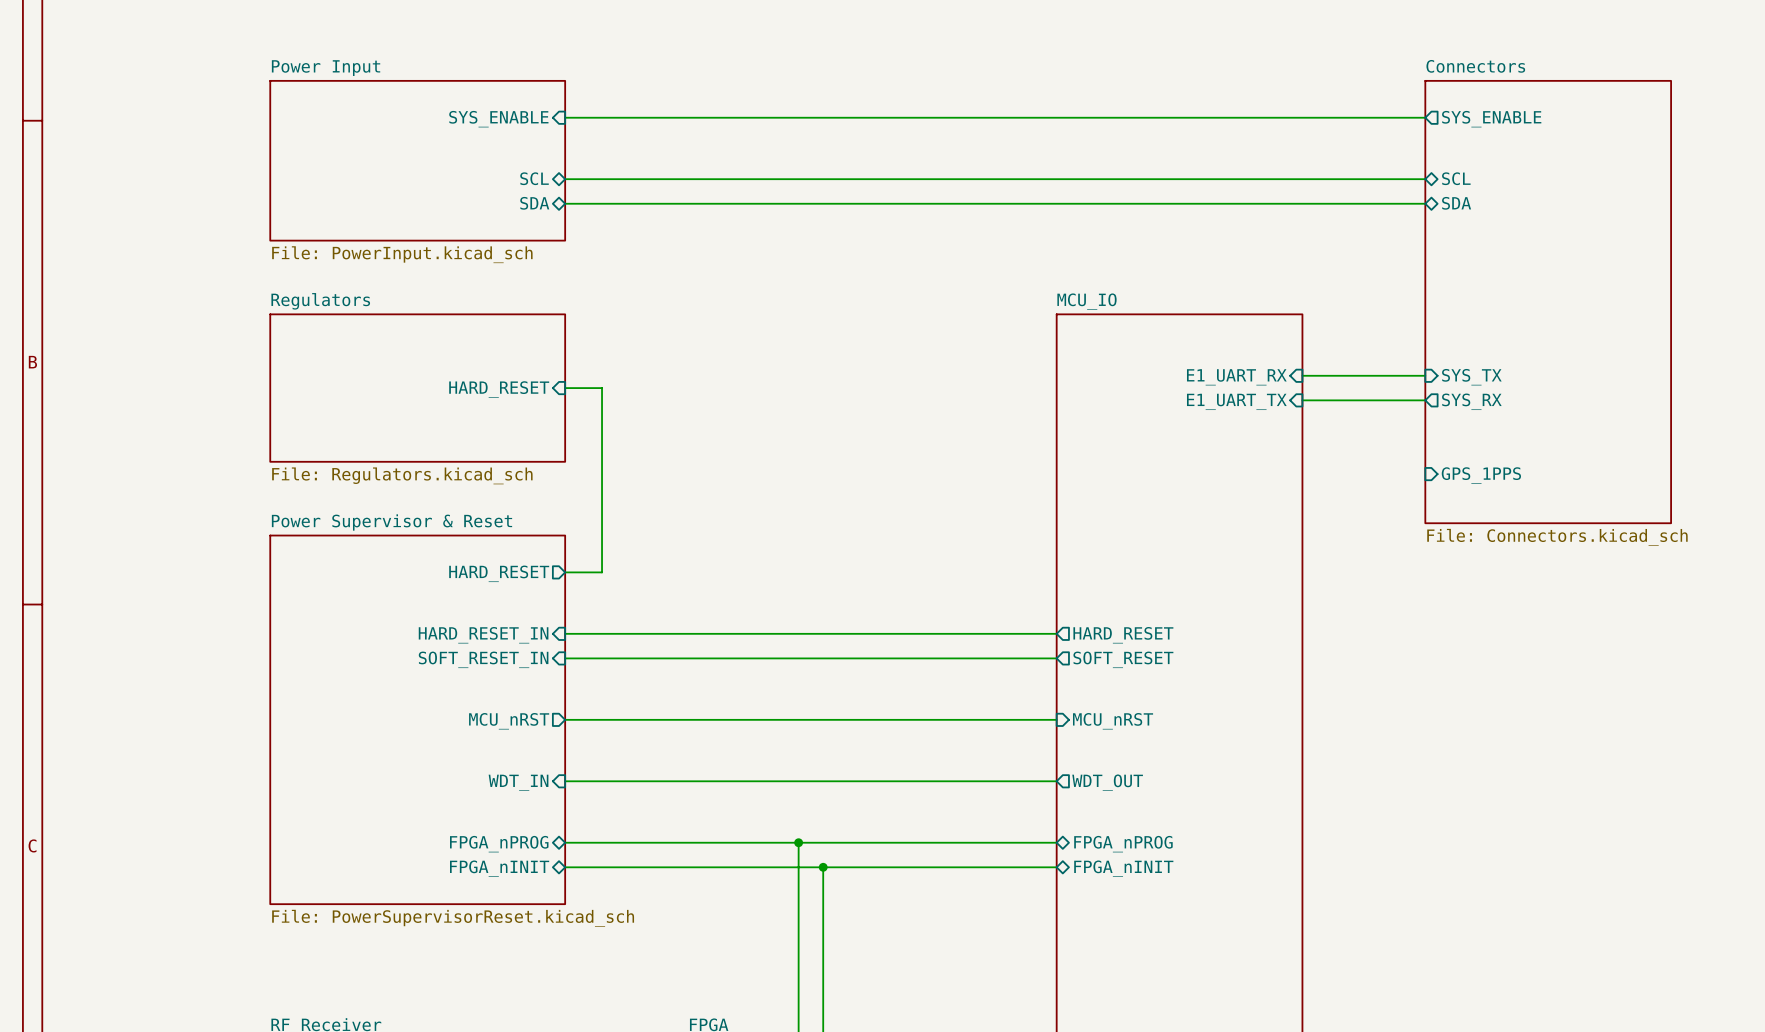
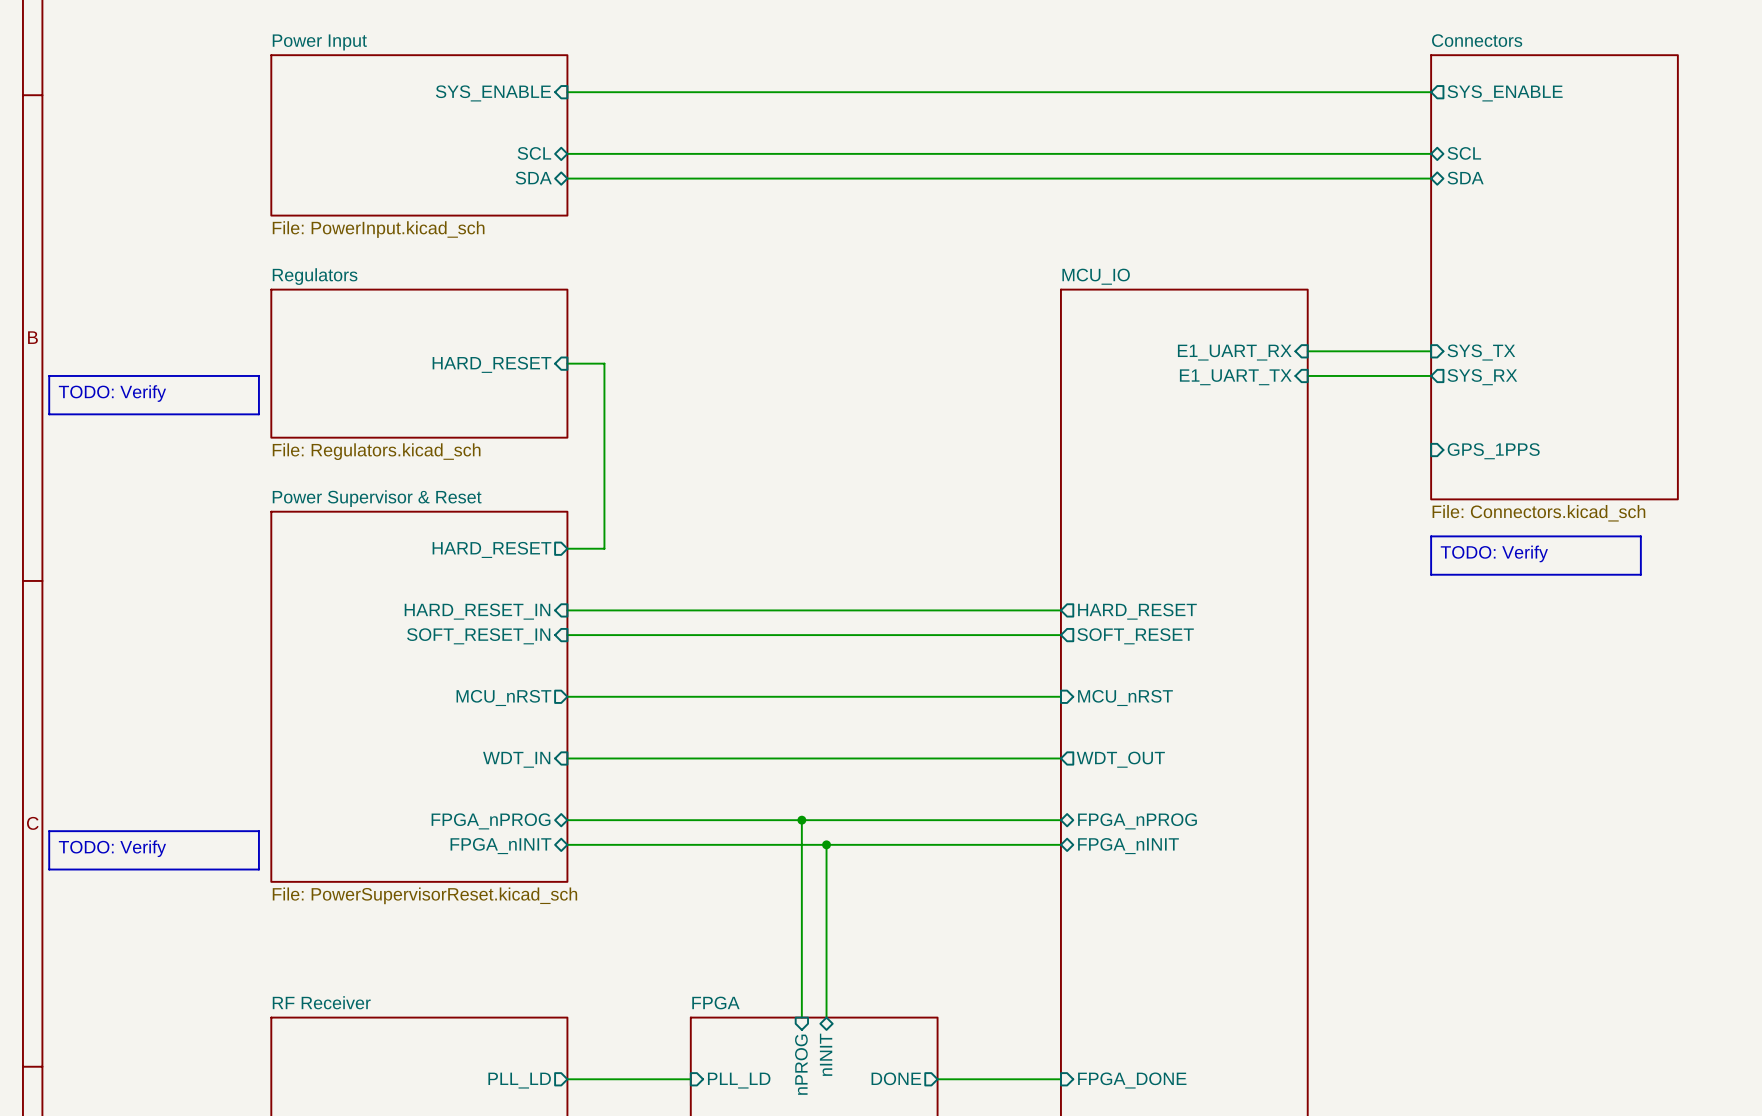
line: none -> (49, 375) (49, 414) (258, 414) (258, 375) (49, 375)
text: none -> TODO: Verify (112, 393)
line: none -> (1431, 536) (1640, 536) (1640, 574) (1431, 574) (1431, 536)
text: none -> TODO: Verify (1494, 553)
line: none -> (49, 831) (258, 831) (258, 869) (49, 869) (49, 831)
text: none -> TODO: Verify (112, 848)

